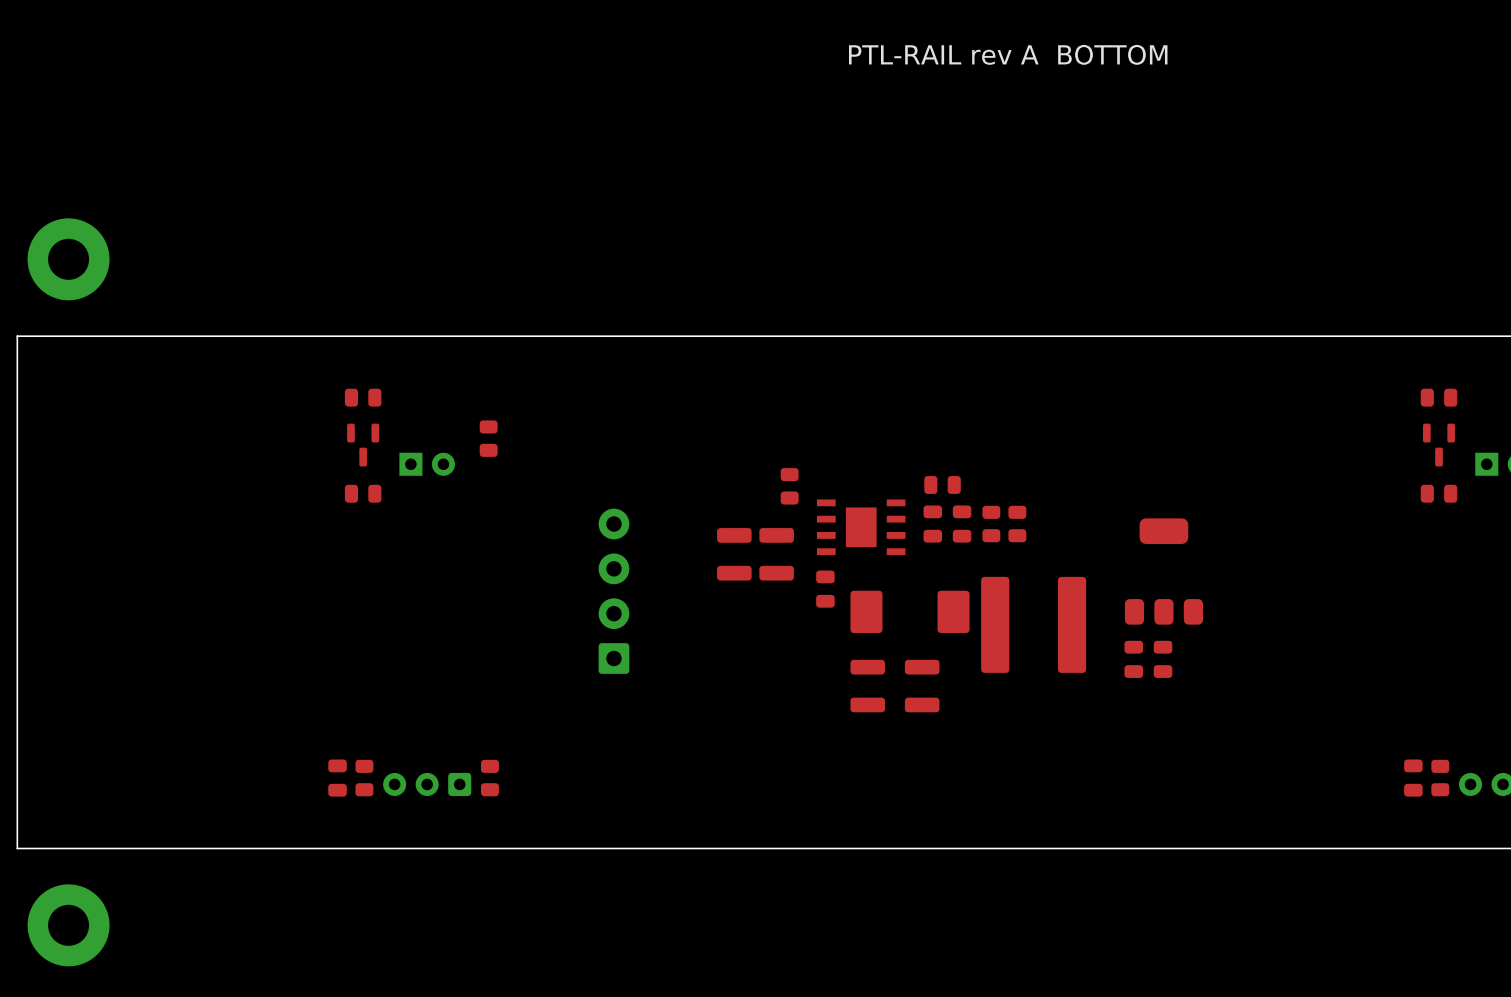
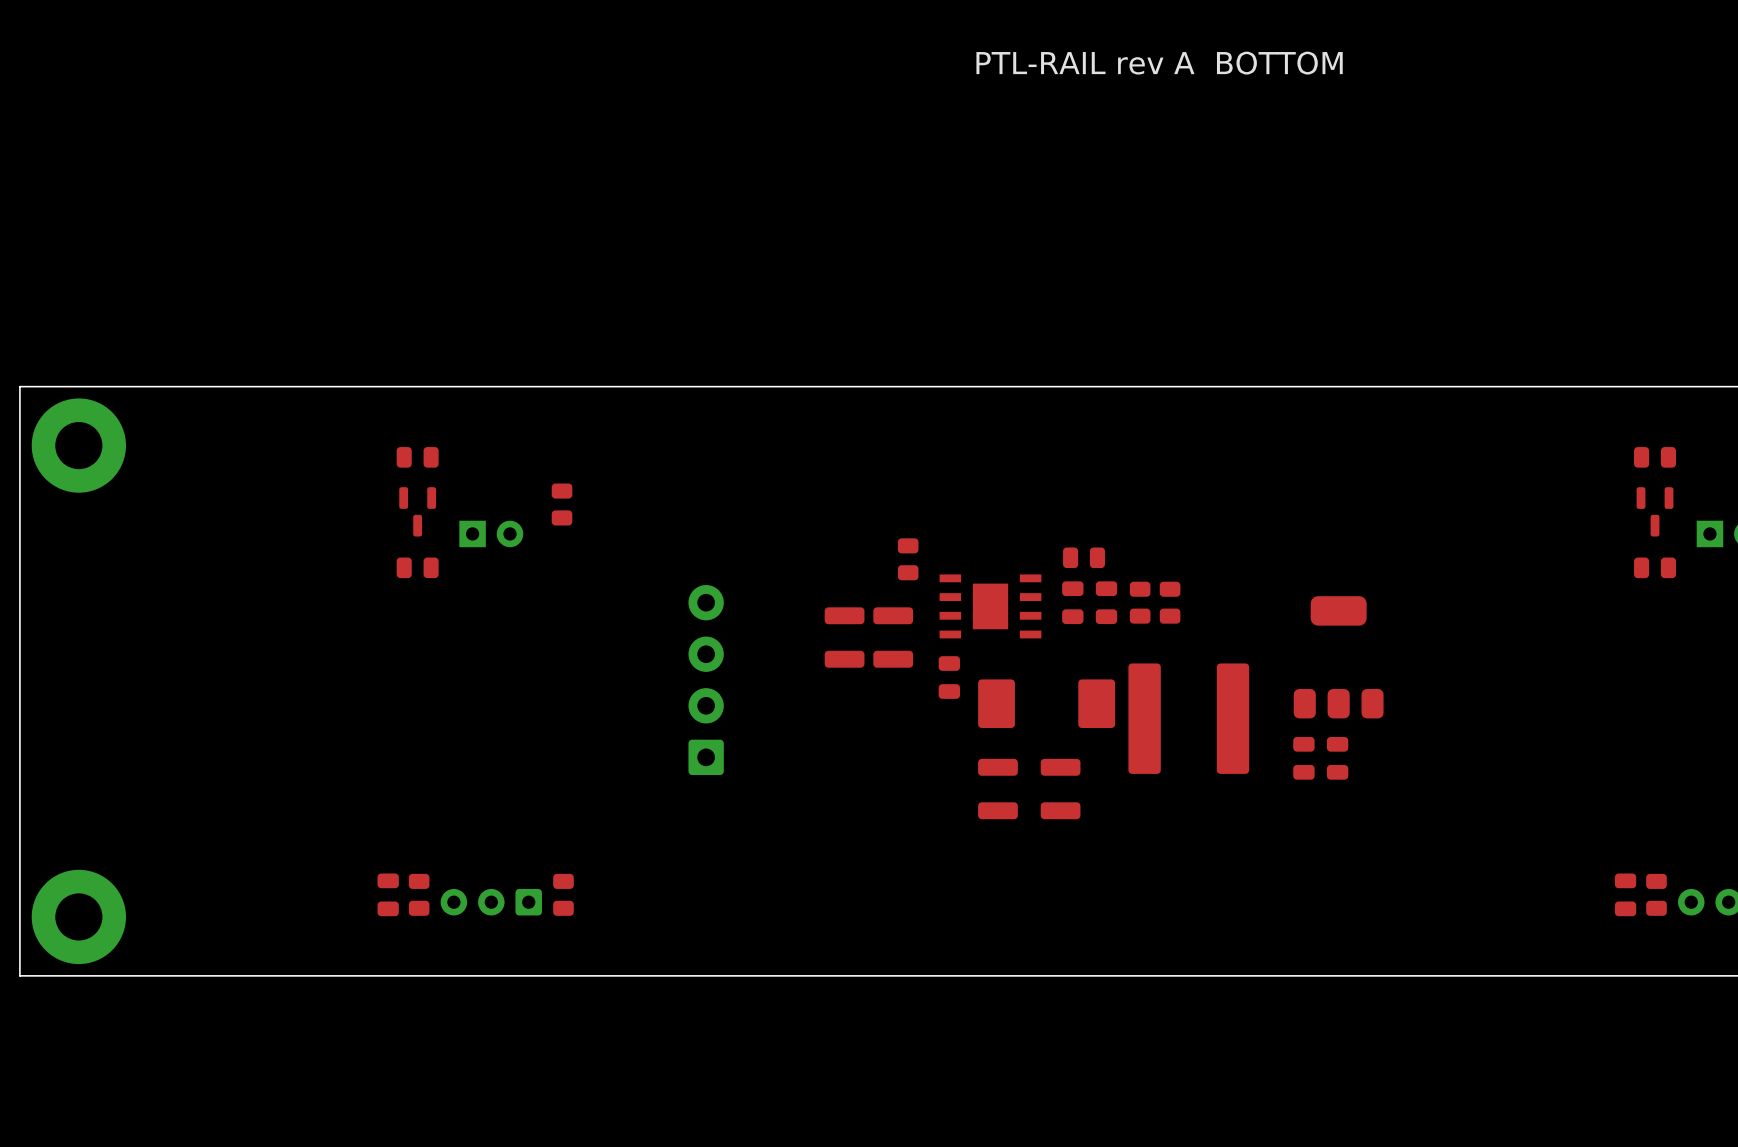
part position: (68, 259) -> (78, 445)
part position: (68, 925) -> (78, 916)

